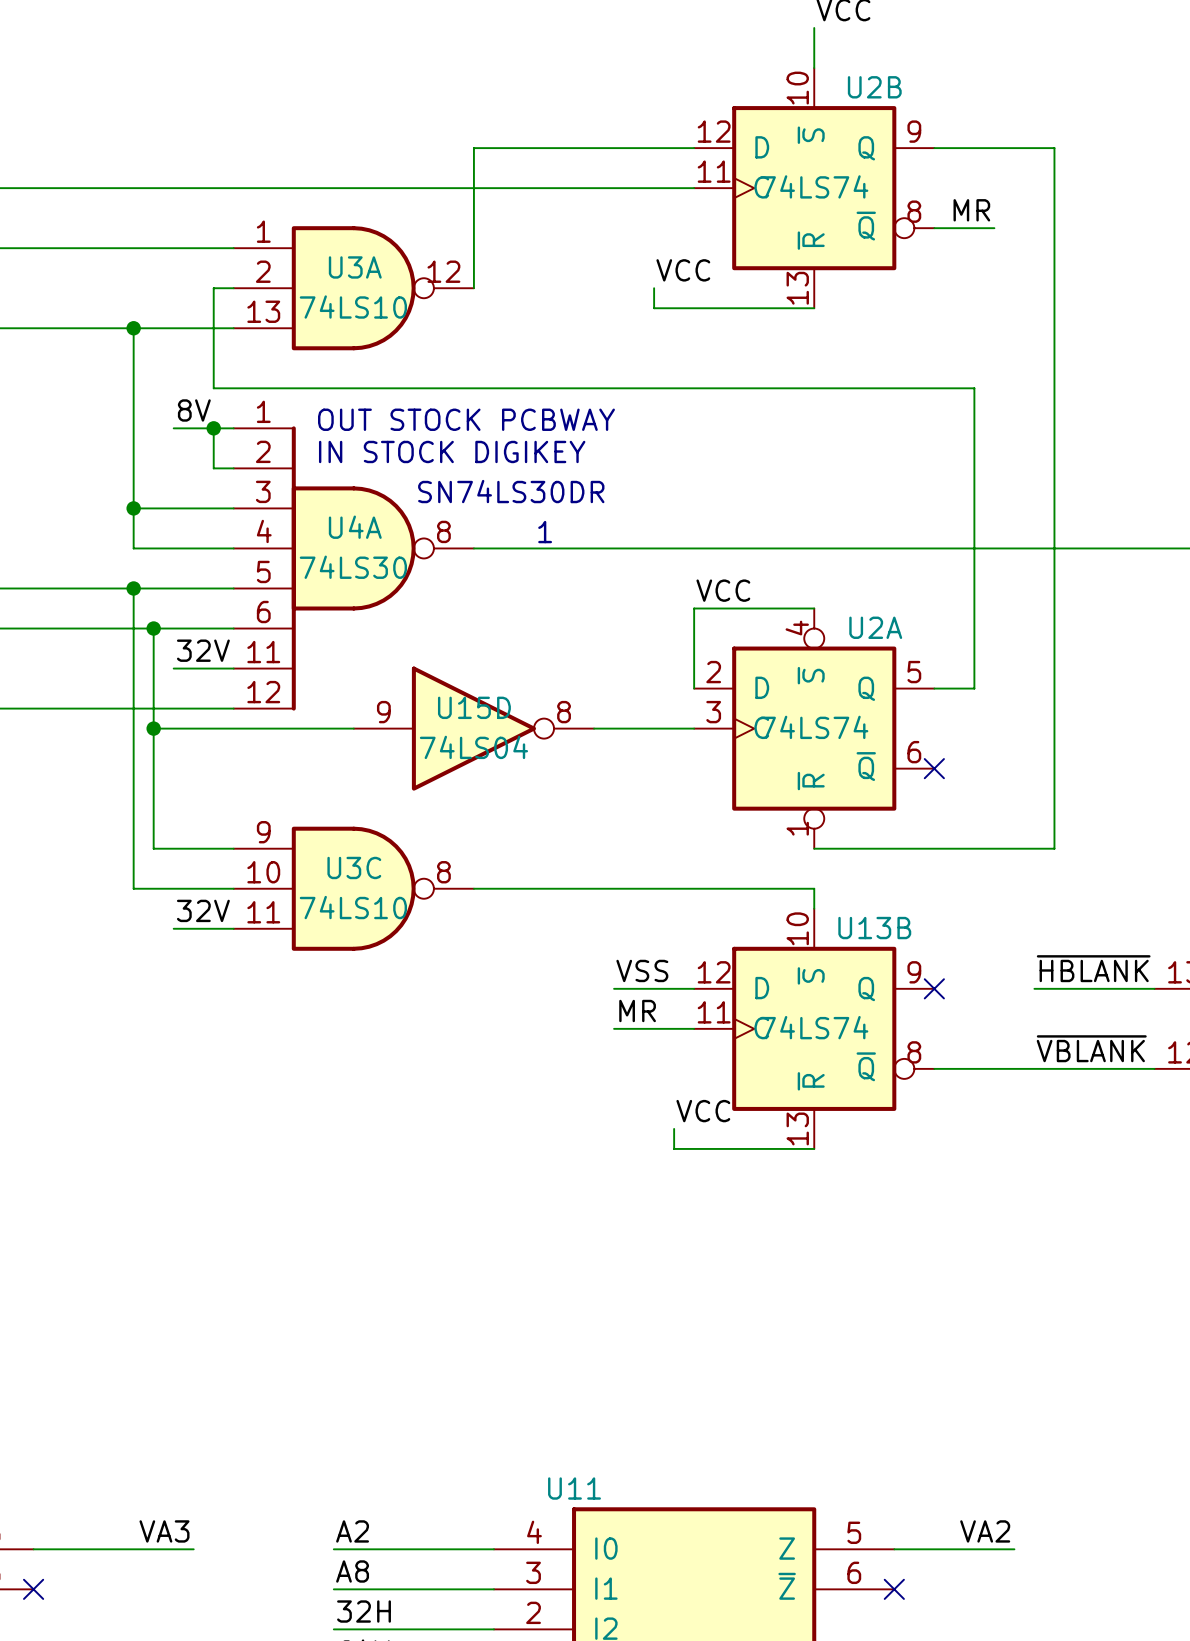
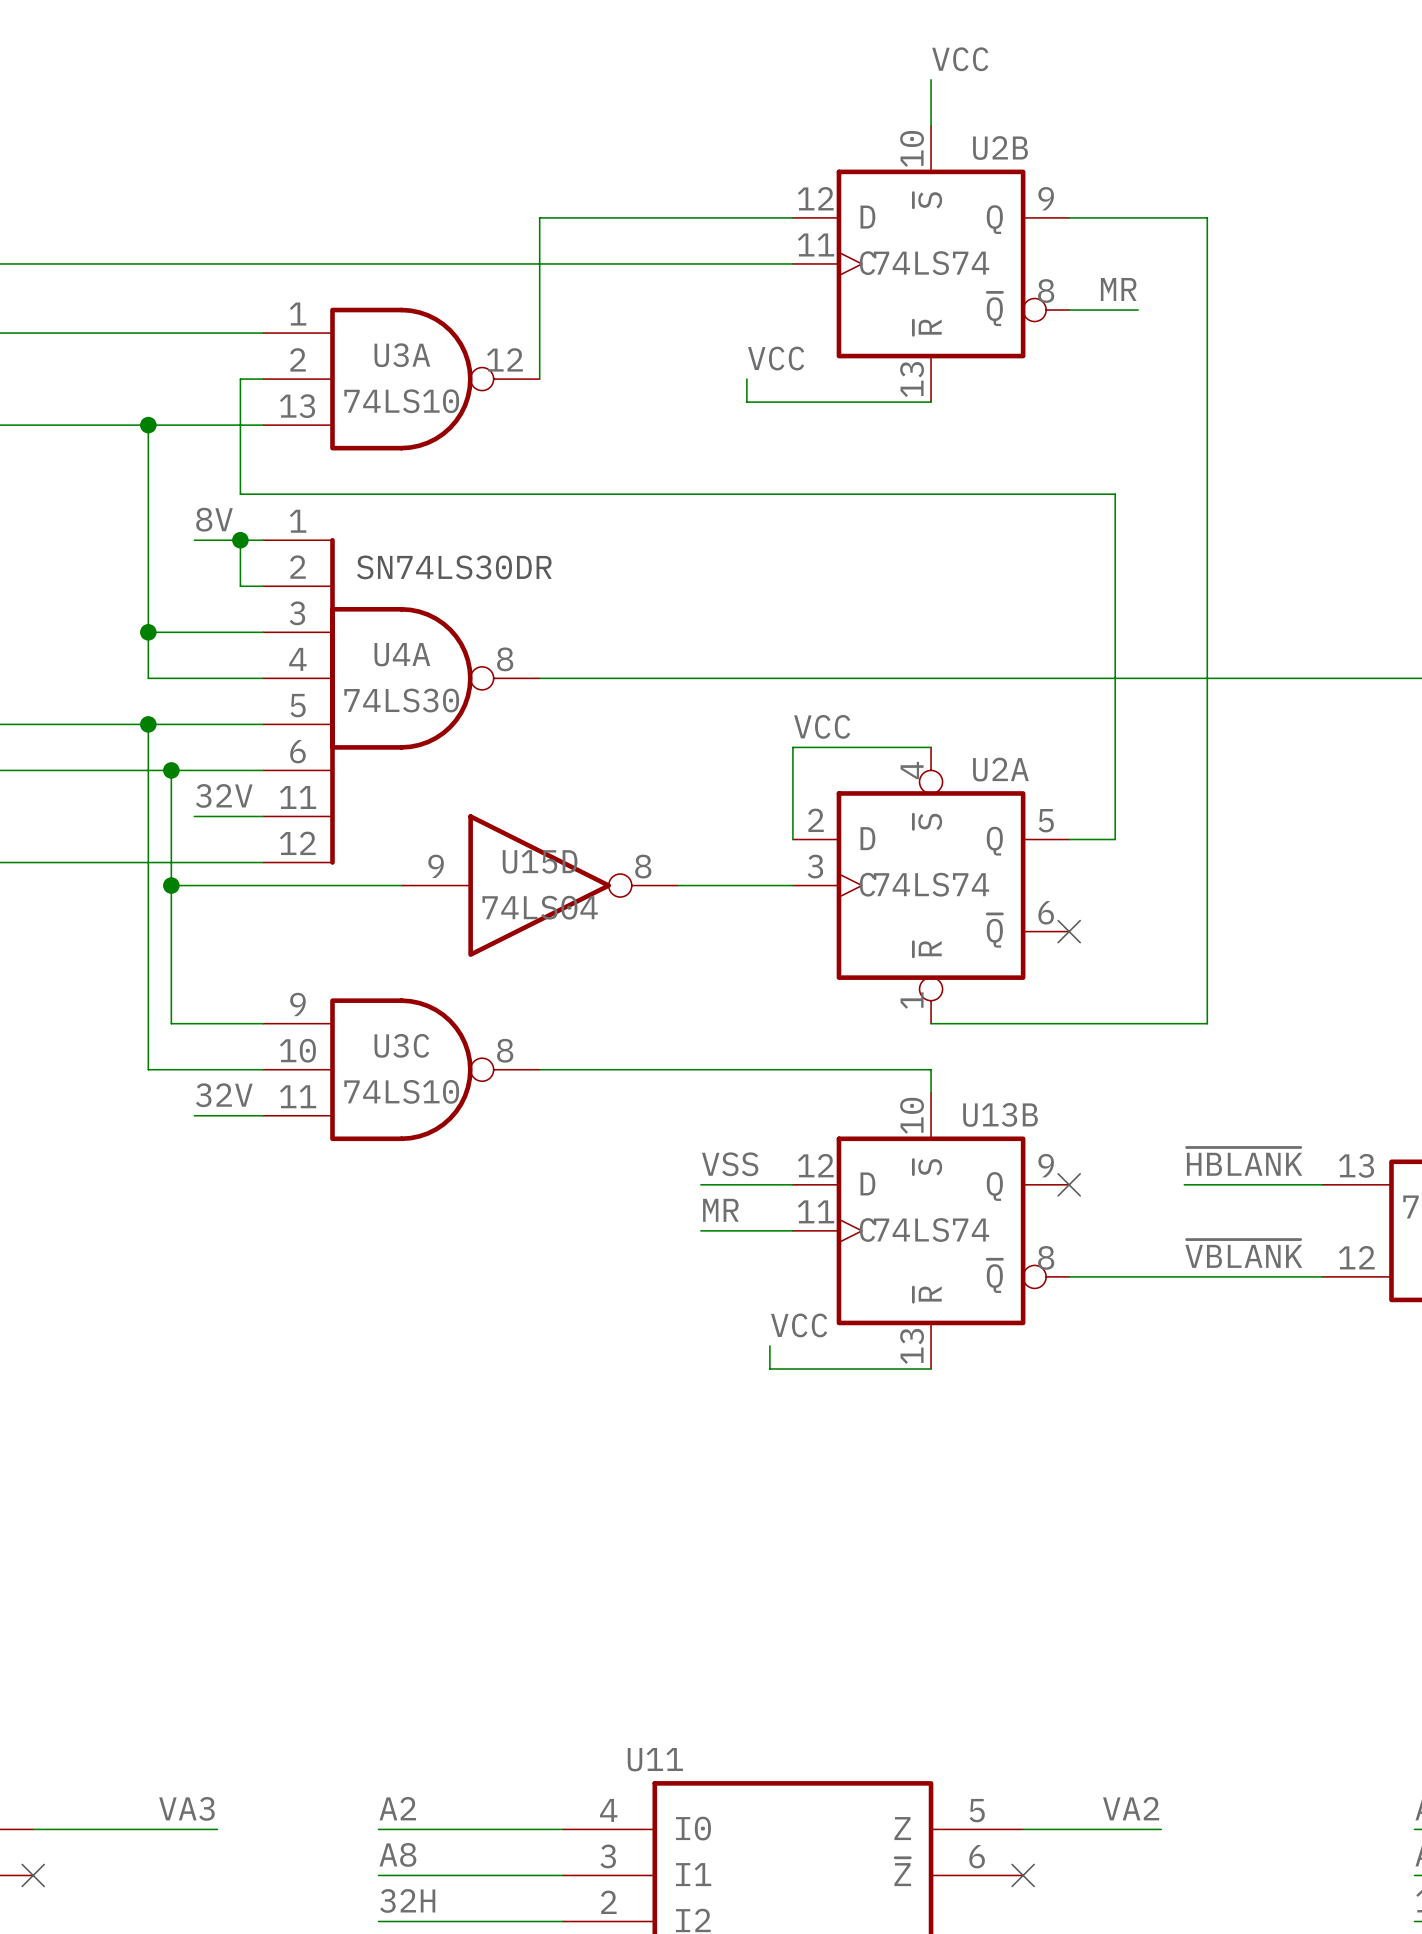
text: OUT STOCK PCBWAY (466, 419) -> none
text: IN STOCK DIGIKEY (452, 451) -> SN74LS30DR (454, 567)
text: SN74LS30DR (511, 491) -> none
text: 1 (545, 532) -> none

